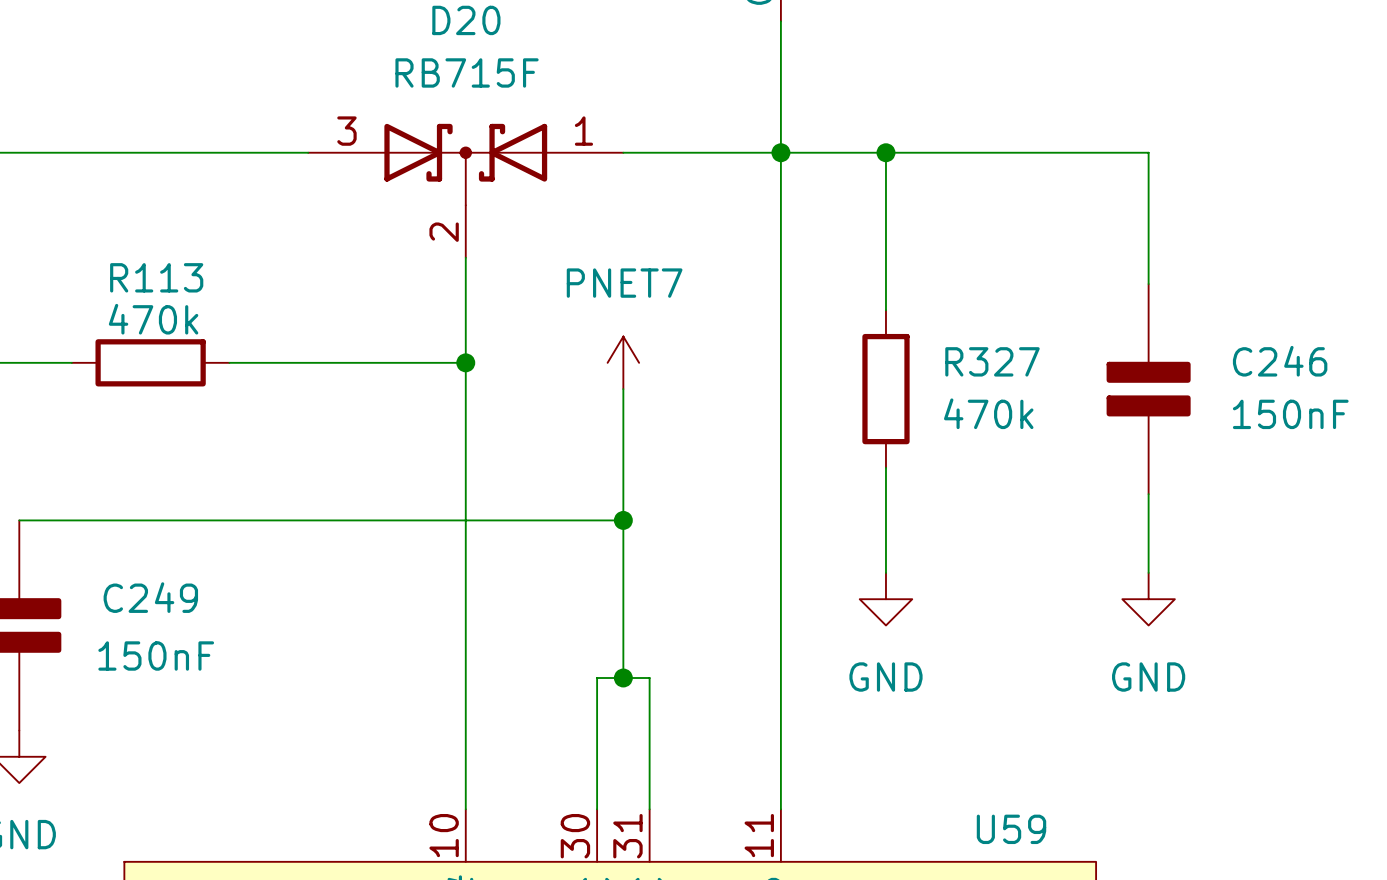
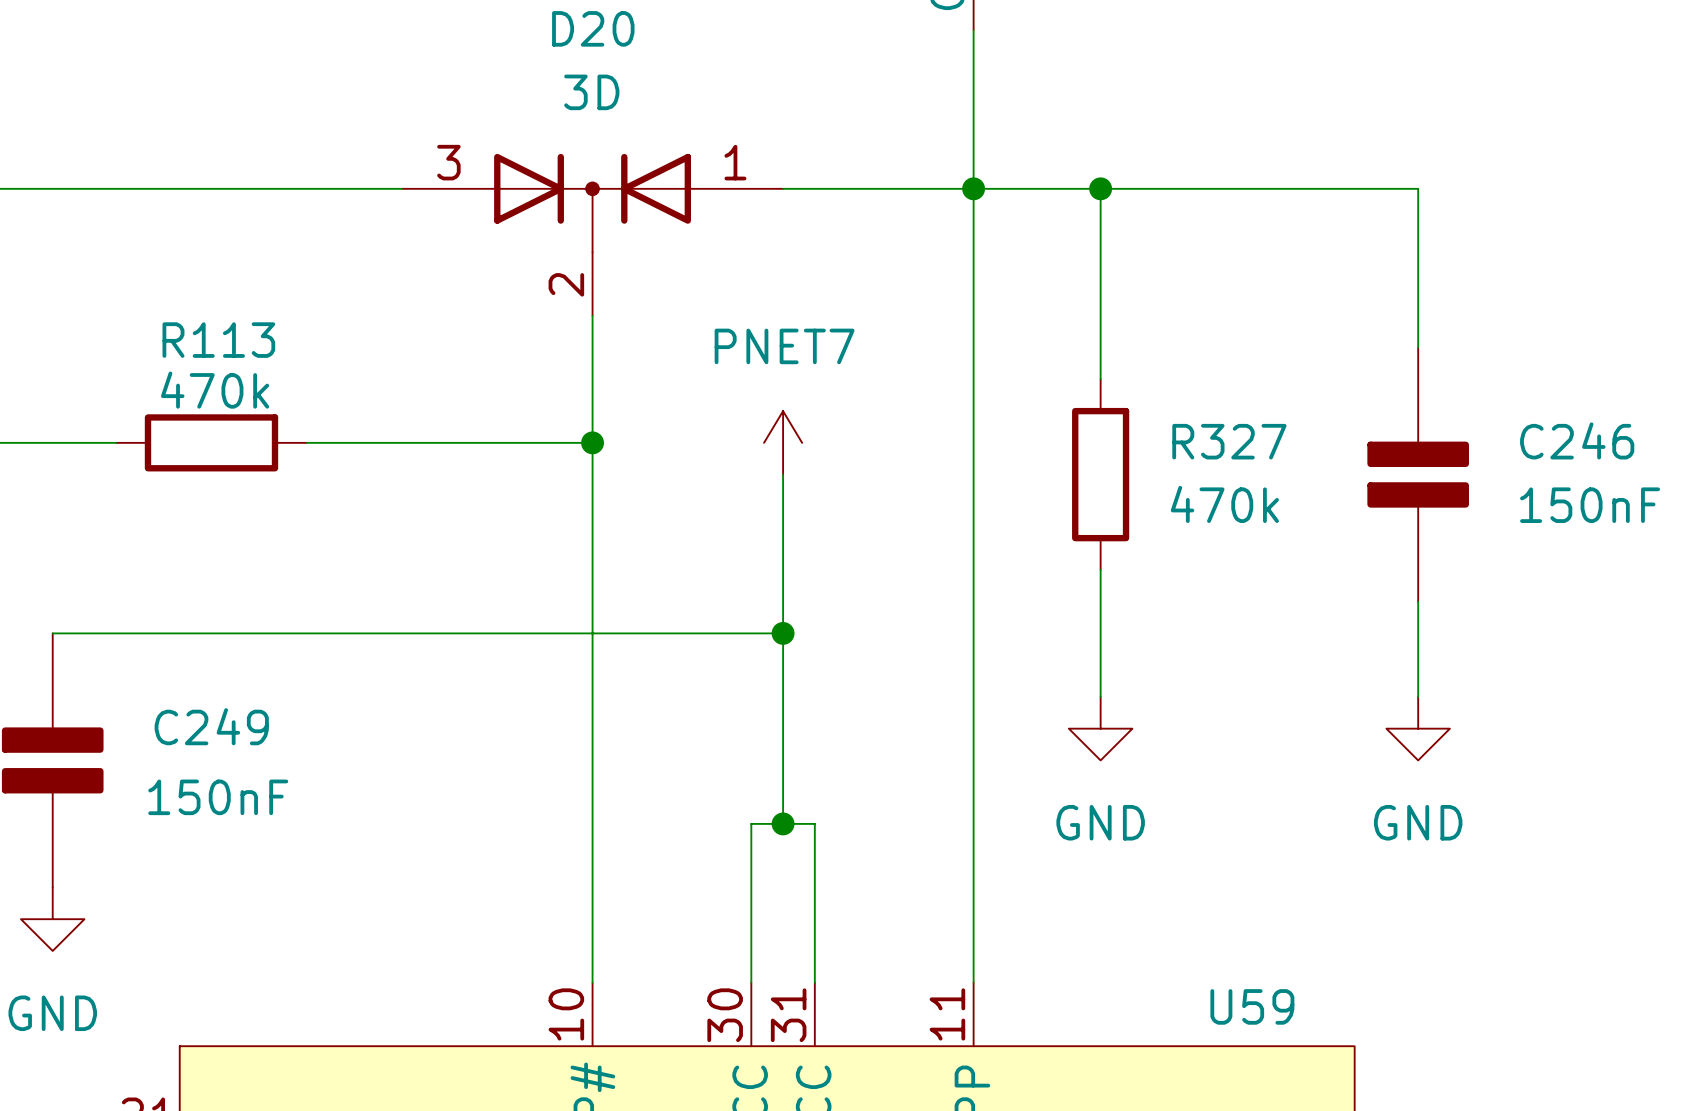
D20 value: RB715F (467, 72) -> 3D (591, 92)
D20 symbol: [308, 123, 624, 258] -> [402, 153, 784, 316]

